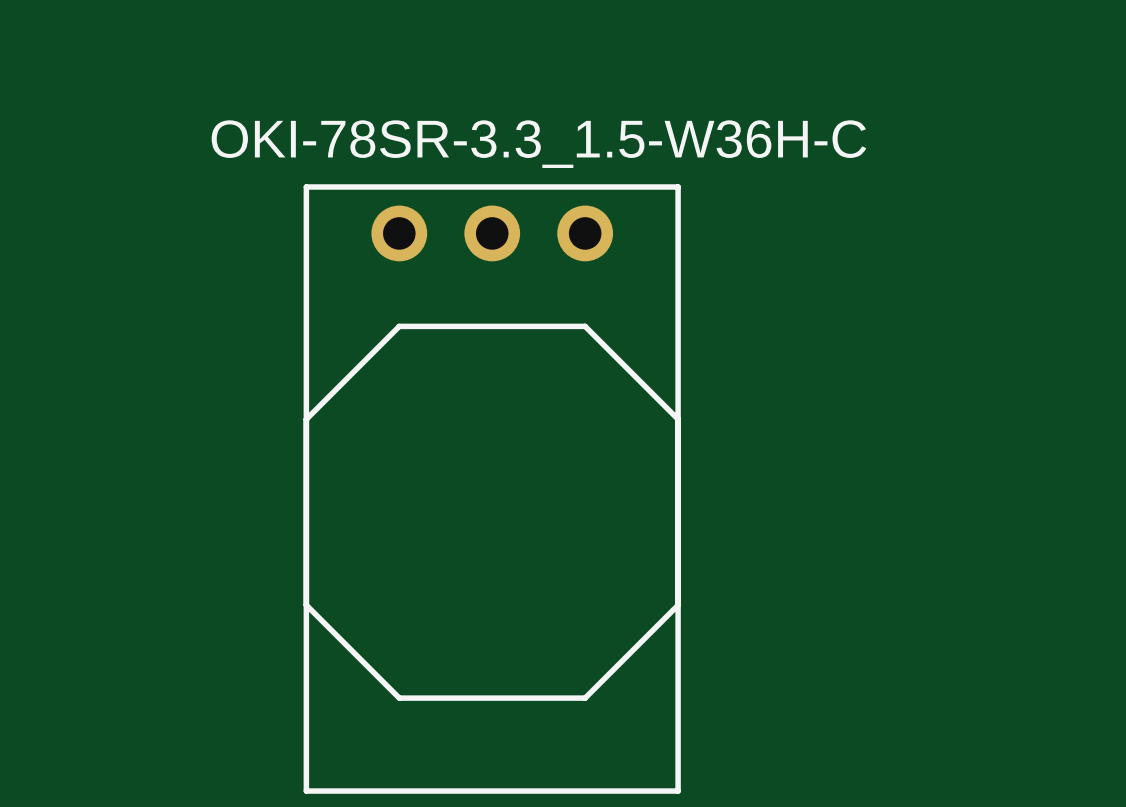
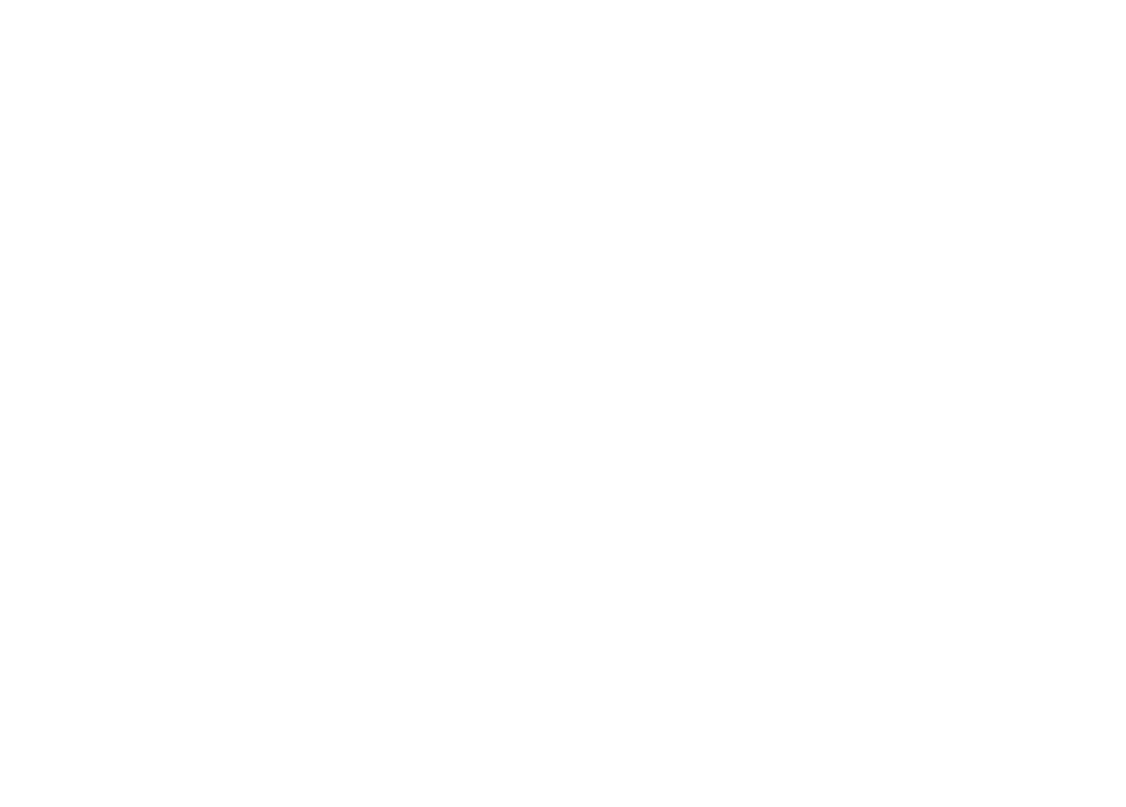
part: OKI-78SR-3.3_1.5-W36H-C (492, 489) -> none

